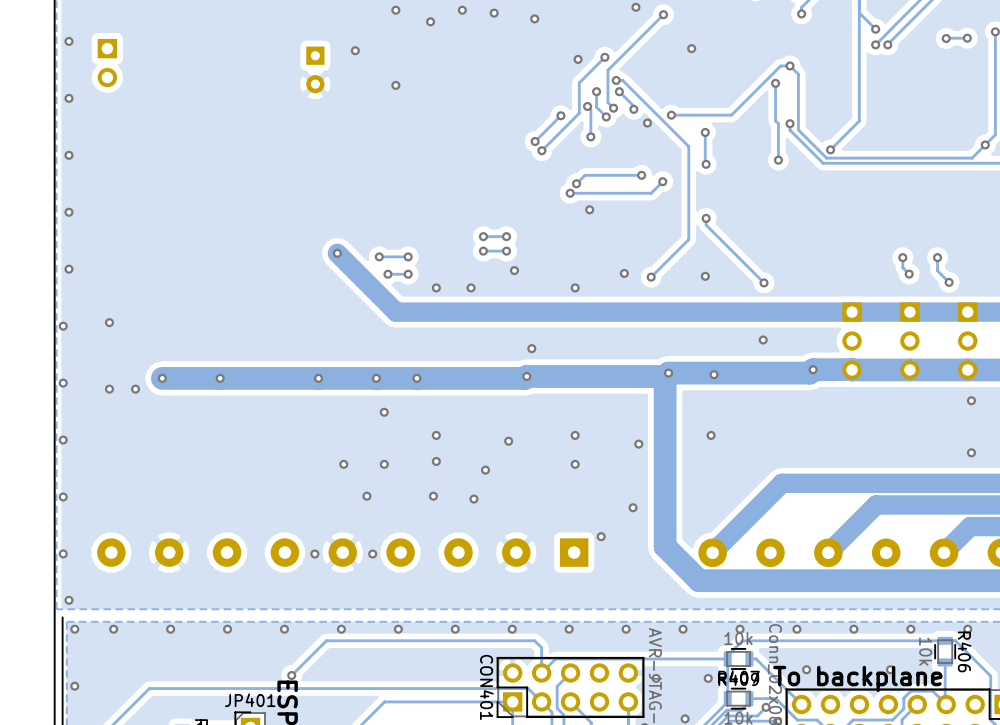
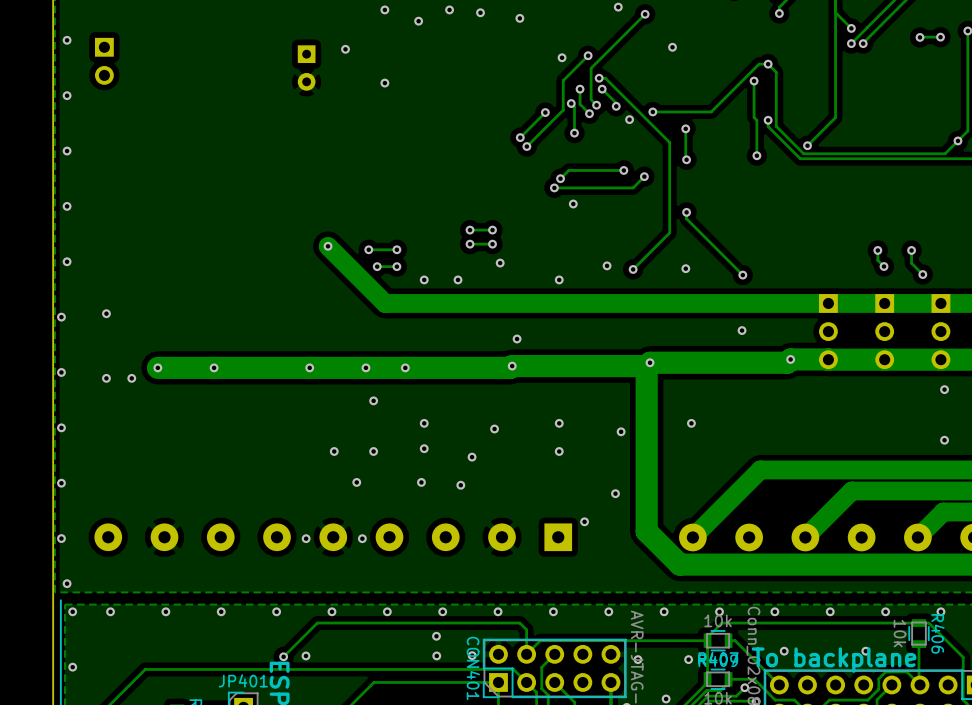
via: (714, 374) -> none
via: none -> (436, 636)
via: none -> (305, 655)
via: none -> (436, 655)
via: none -> (472, 655)

